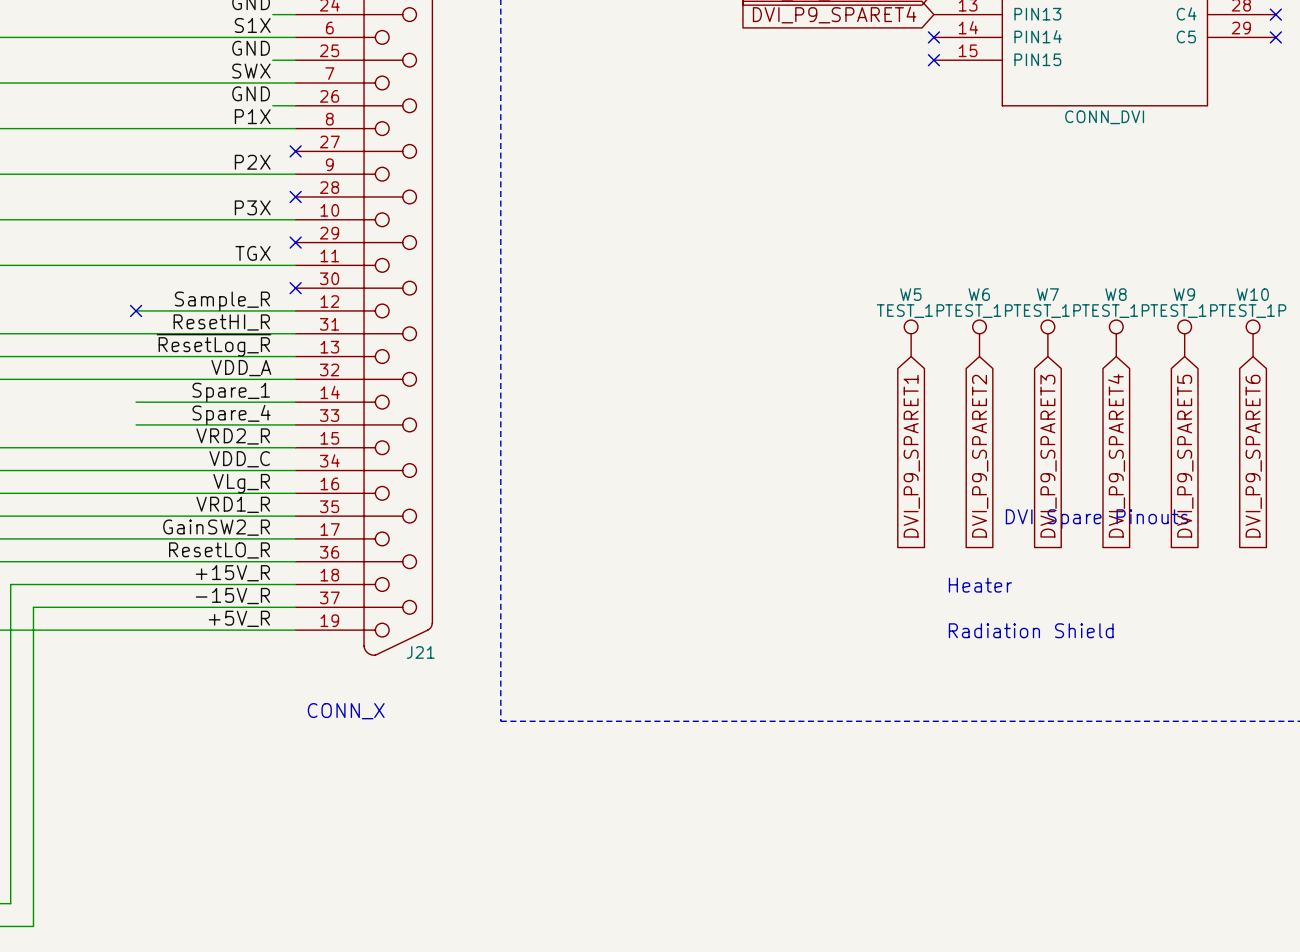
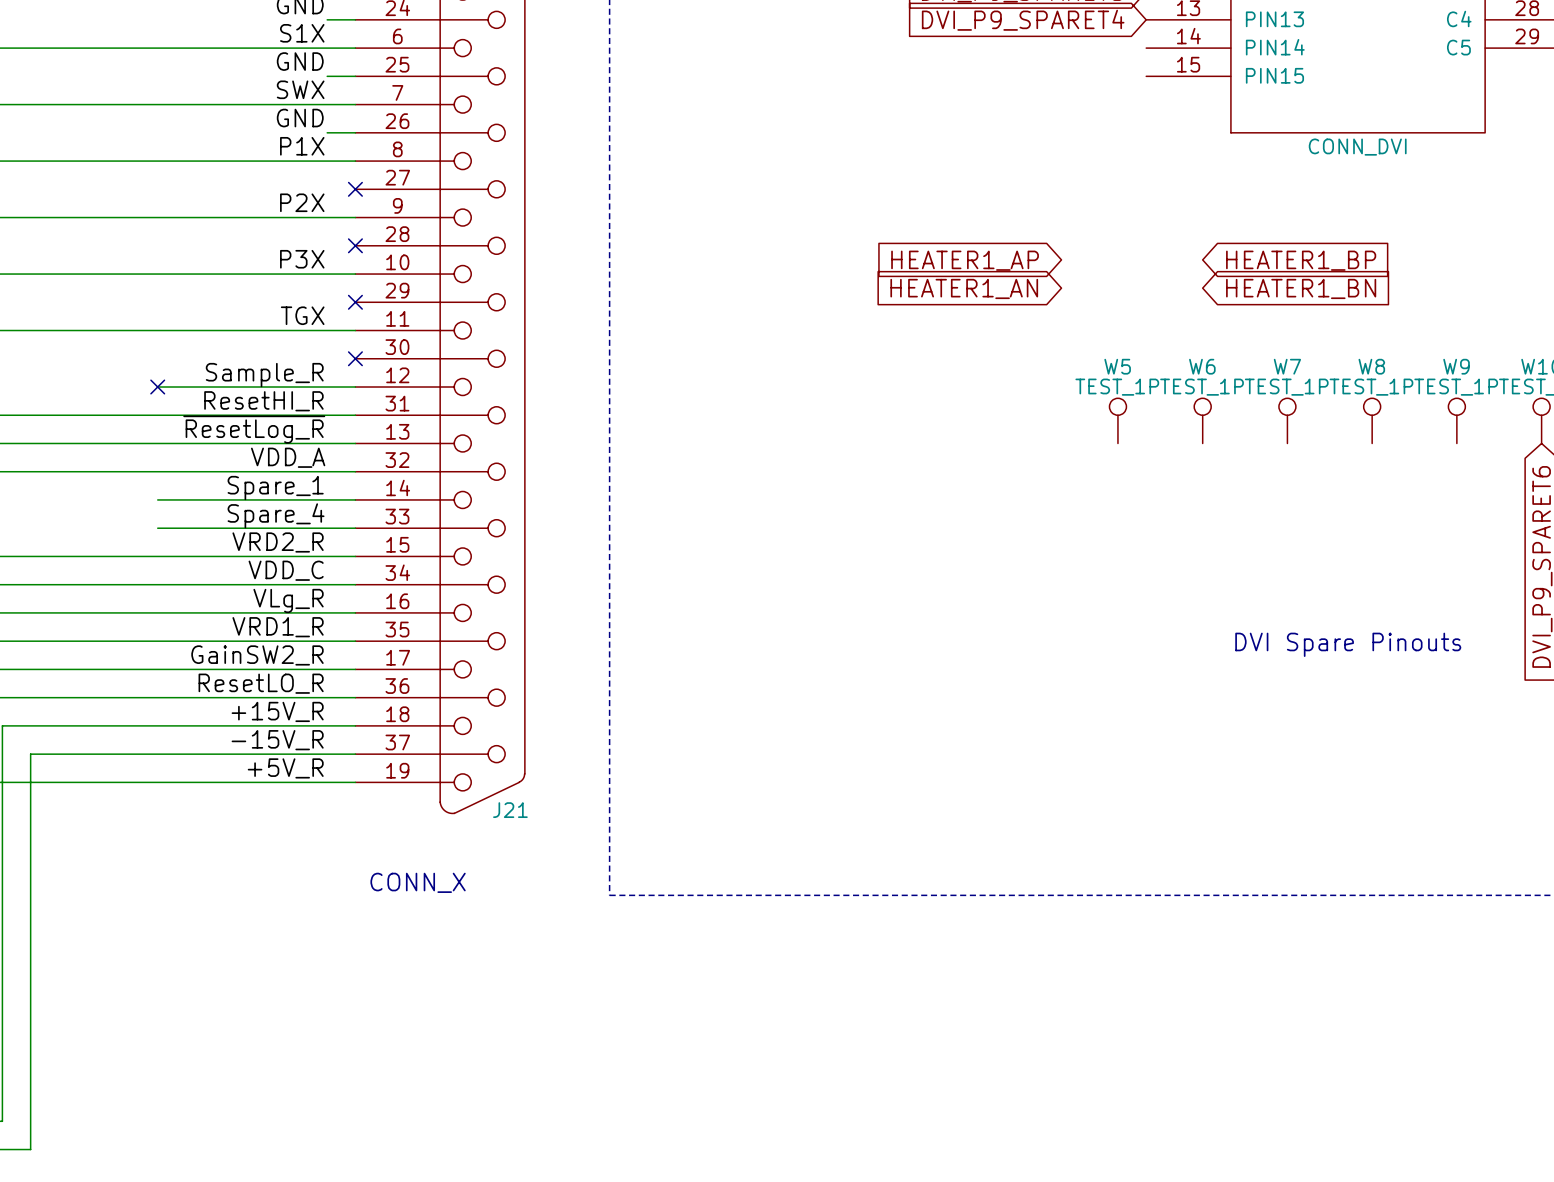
no-connect mark: (933, 37) -> none
no-connect mark: (933, 60) -> none
global label: none -> HEATER1_AP (965, 260)
global label: none -> HEATER1_BP (1301, 260)
global label: none -> HEATER1_AN (964, 288)
global label: none -> HEATER1_BN (1301, 288)
global label: DVI_P9_SPARET4 (1116, 455) -> none
global label: DVI_P9_SPARET1 (911, 456) -> none
global label: DVI_P9_SPARET2 (980, 456) -> none
global label: DVI_P9_SPARET3 (1048, 456) -> none
global label: DVI_P9_SPARET5 (1185, 456) -> none
text: Heater (980, 585) -> none
text: Radiation Shield (1031, 630) -> none

